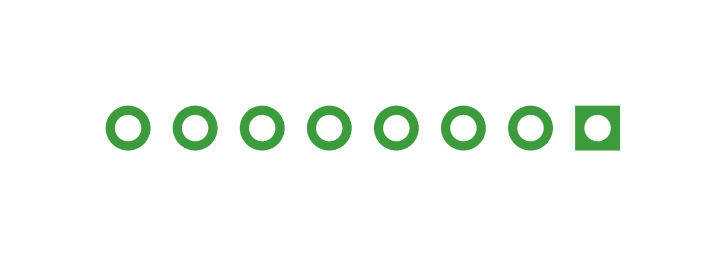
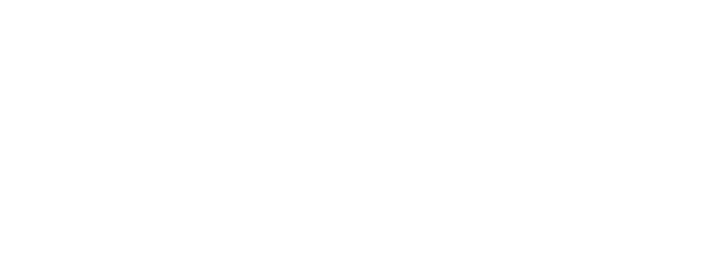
part: (362, 128) -> none

